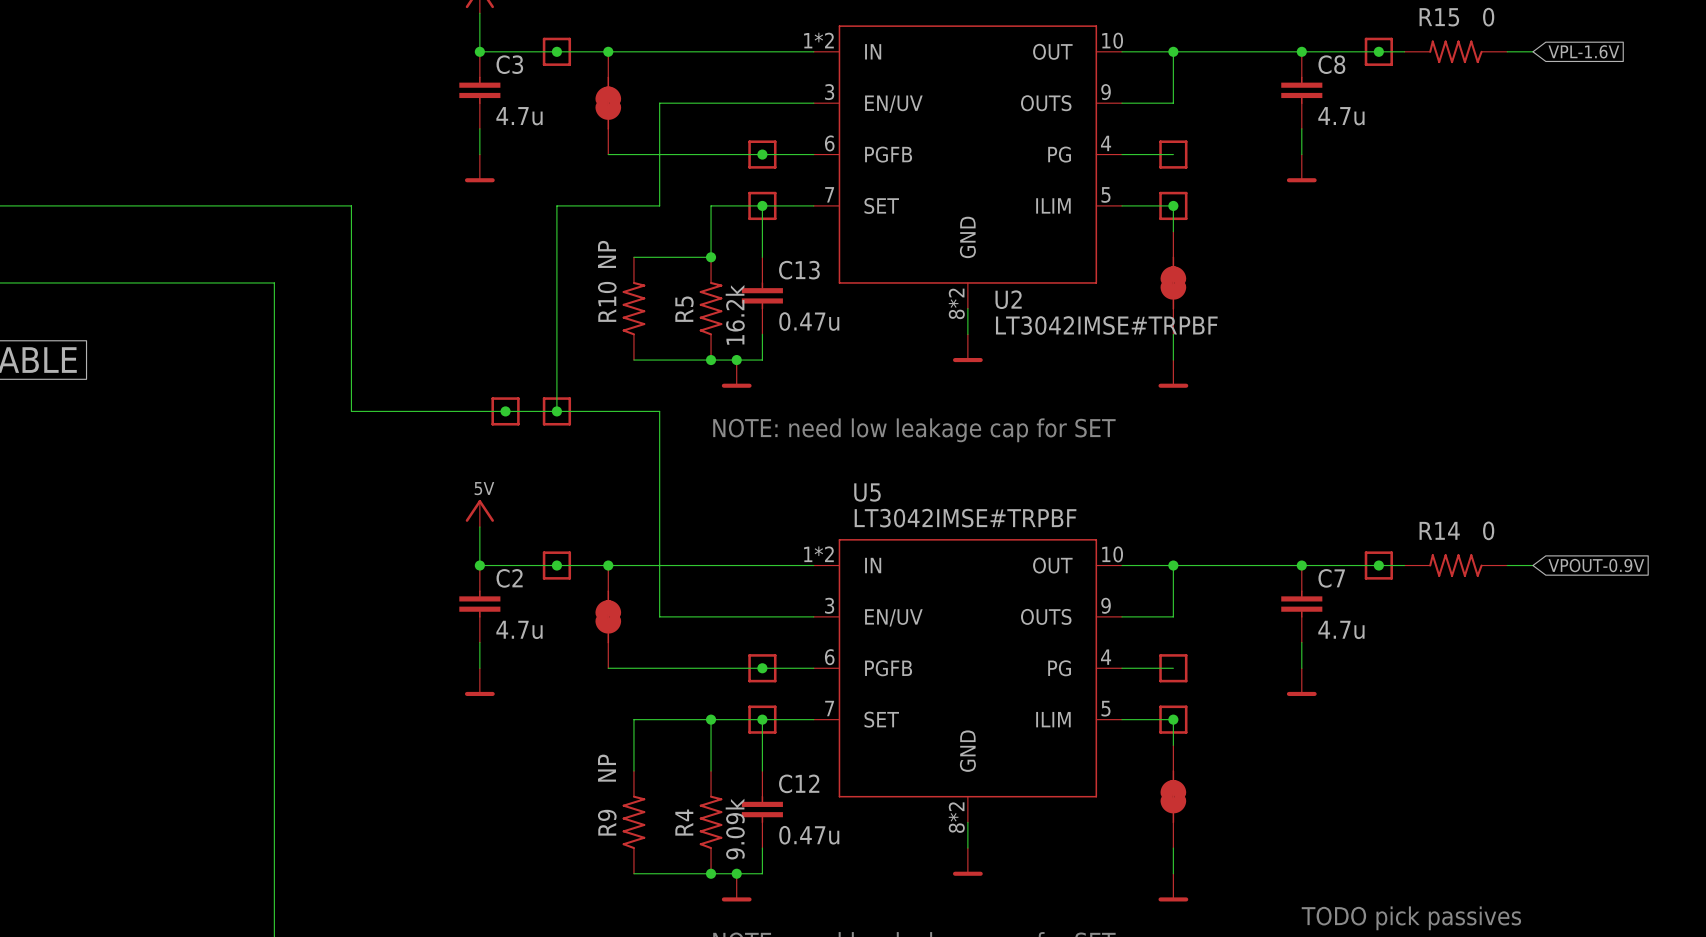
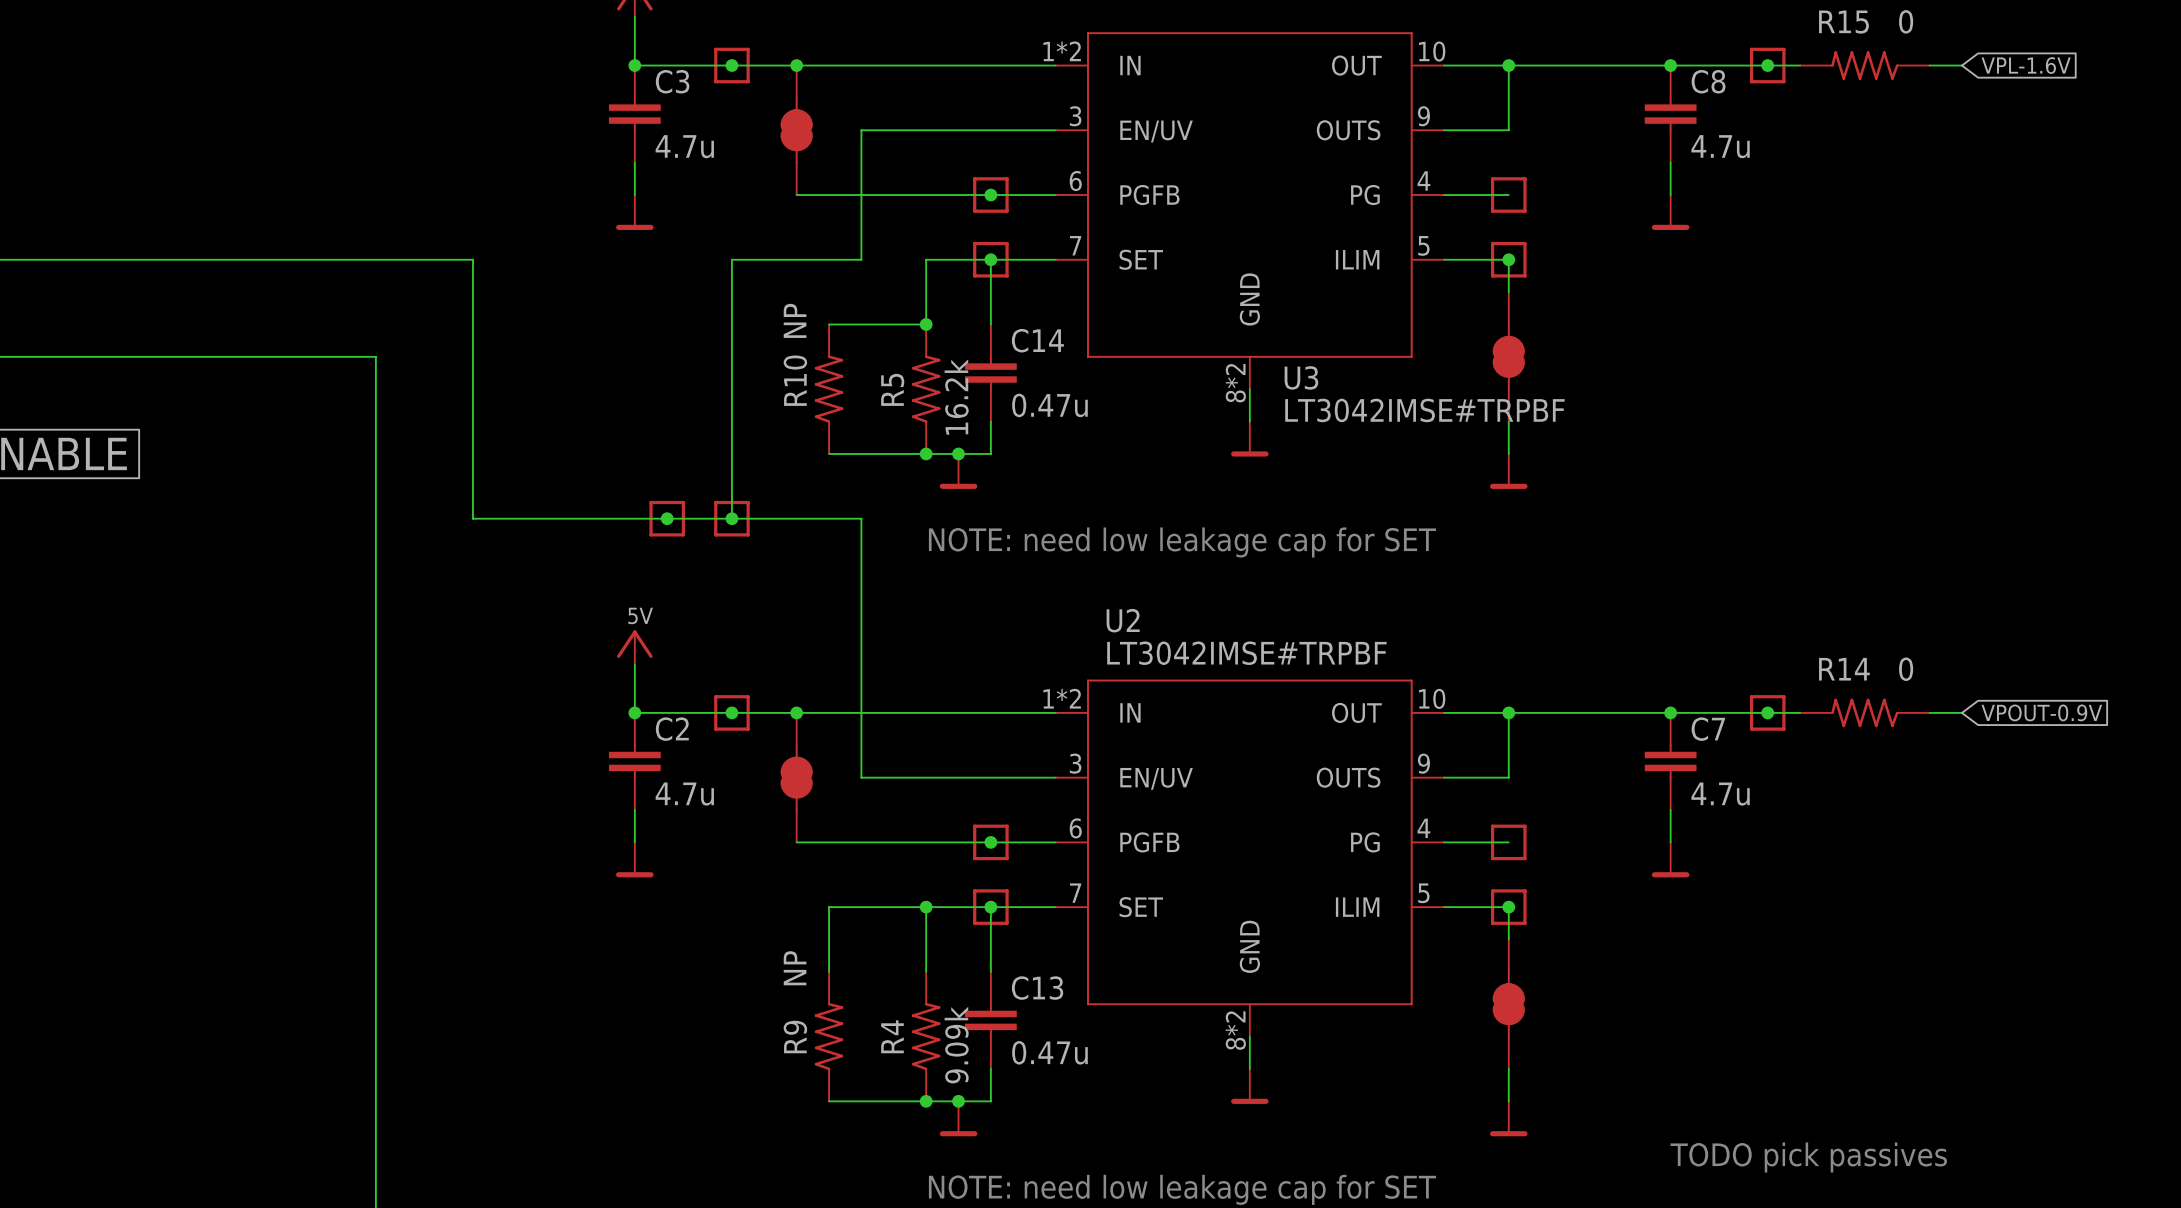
C13 name: C13 (799, 270) -> C14 (1037, 340)
U2 name: U2 (1008, 299) -> U3 (1301, 377)
U5 name: U5 (867, 492) -> U2 (1123, 620)
C12 name: C12 (799, 783) -> C13 (1037, 988)

